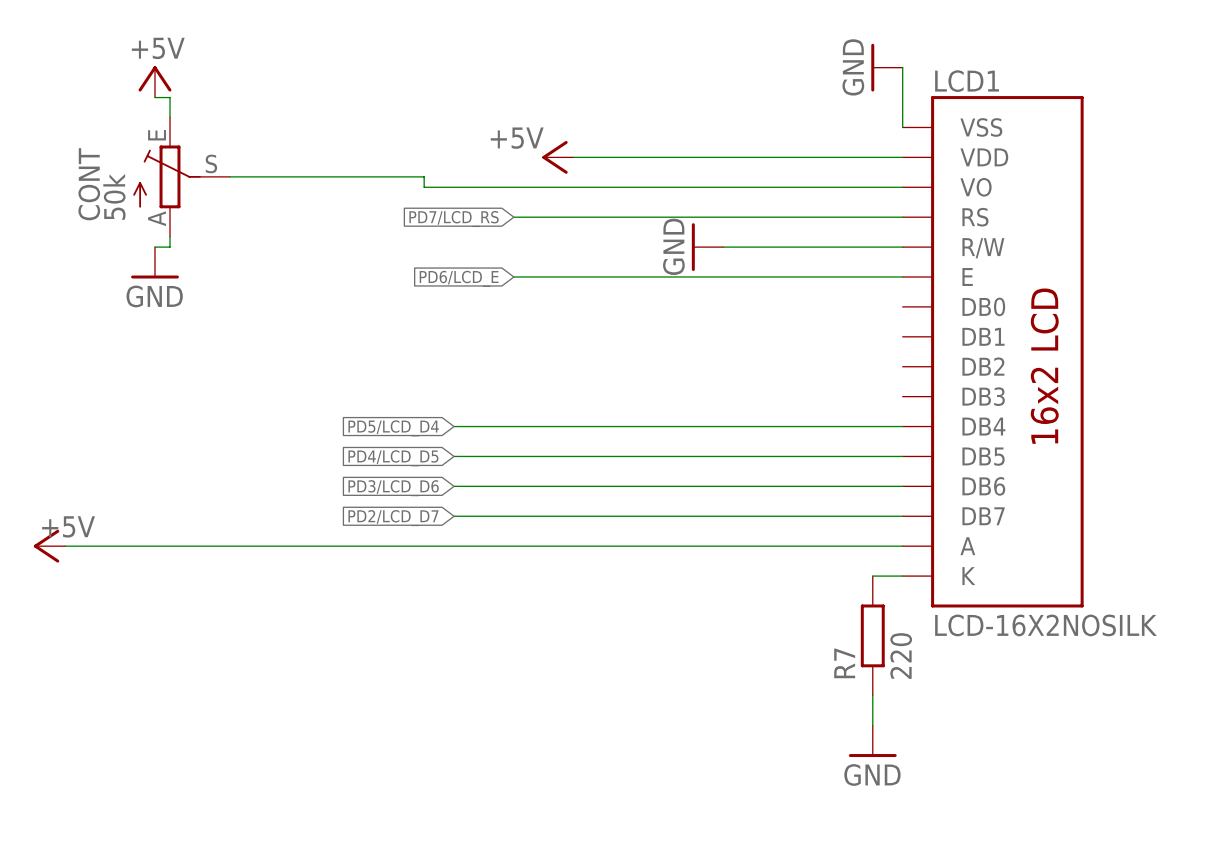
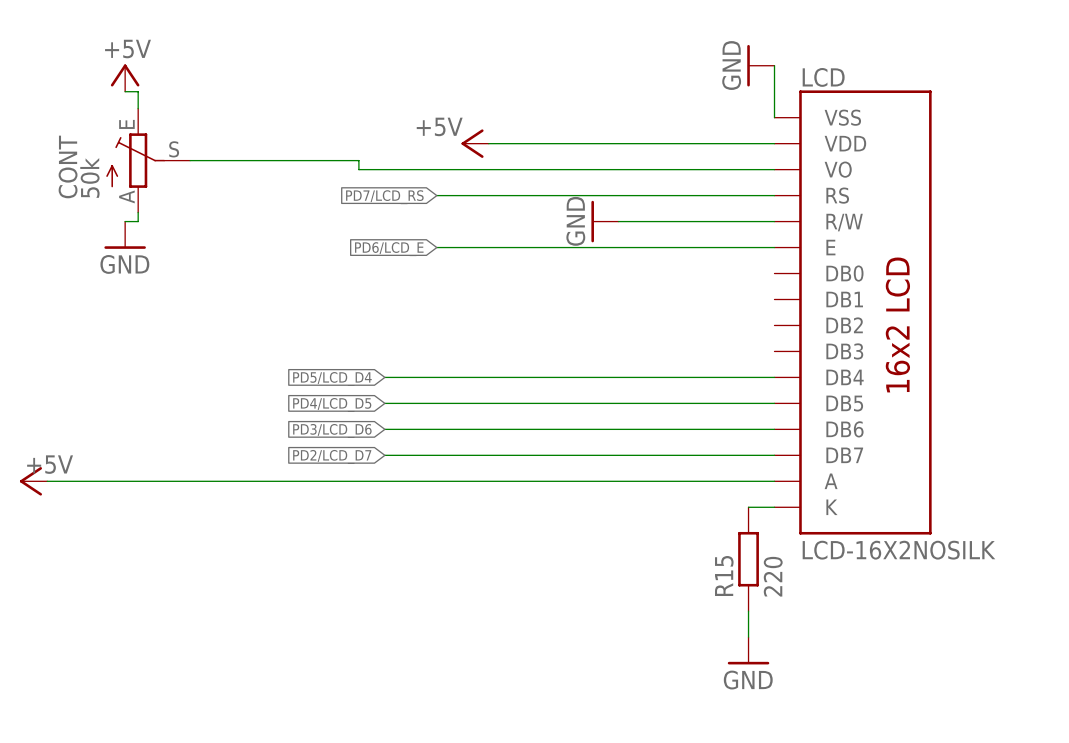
LCD1 name: LCD1 (967, 81) -> LCD (823, 77)
R7 name: R7 (844, 663) -> R15 (724, 576)

